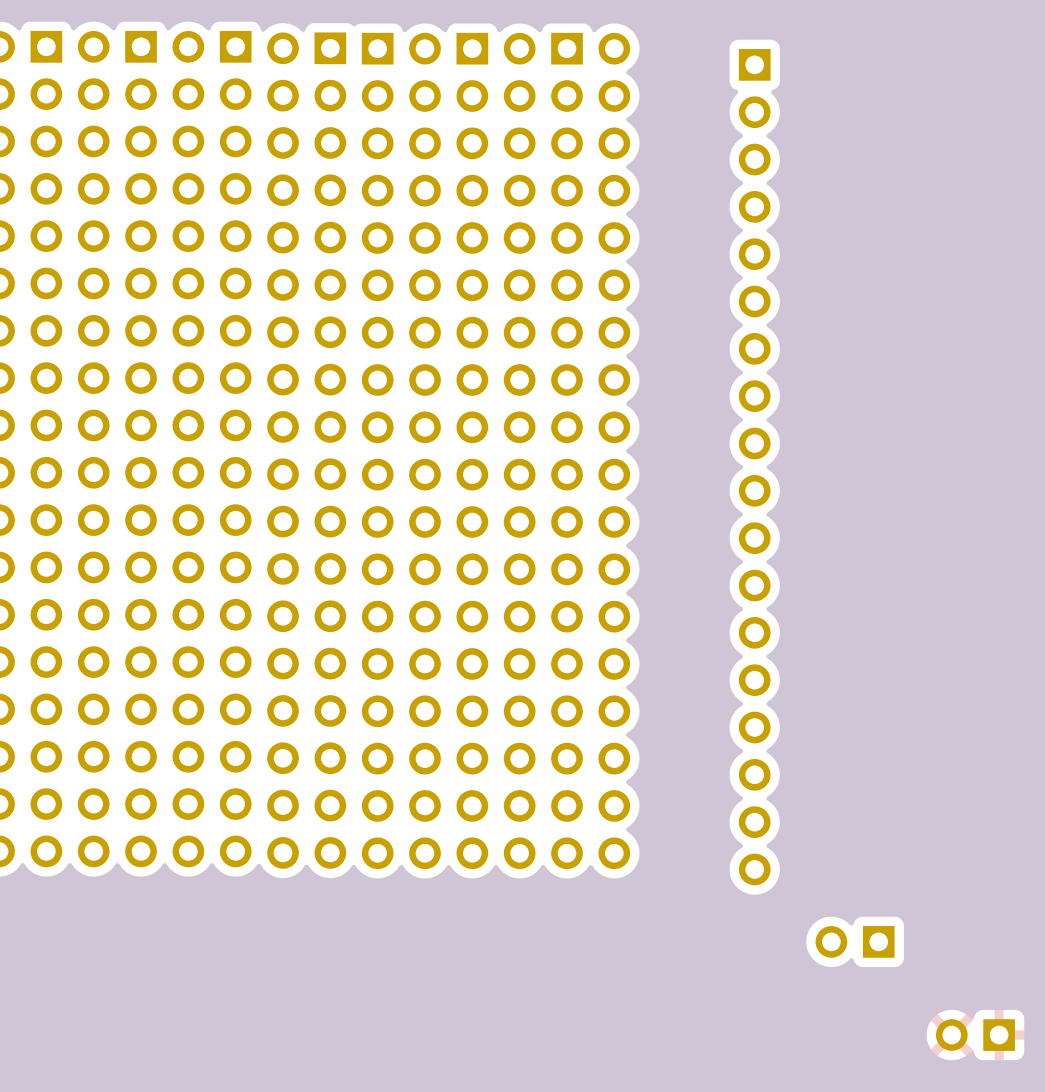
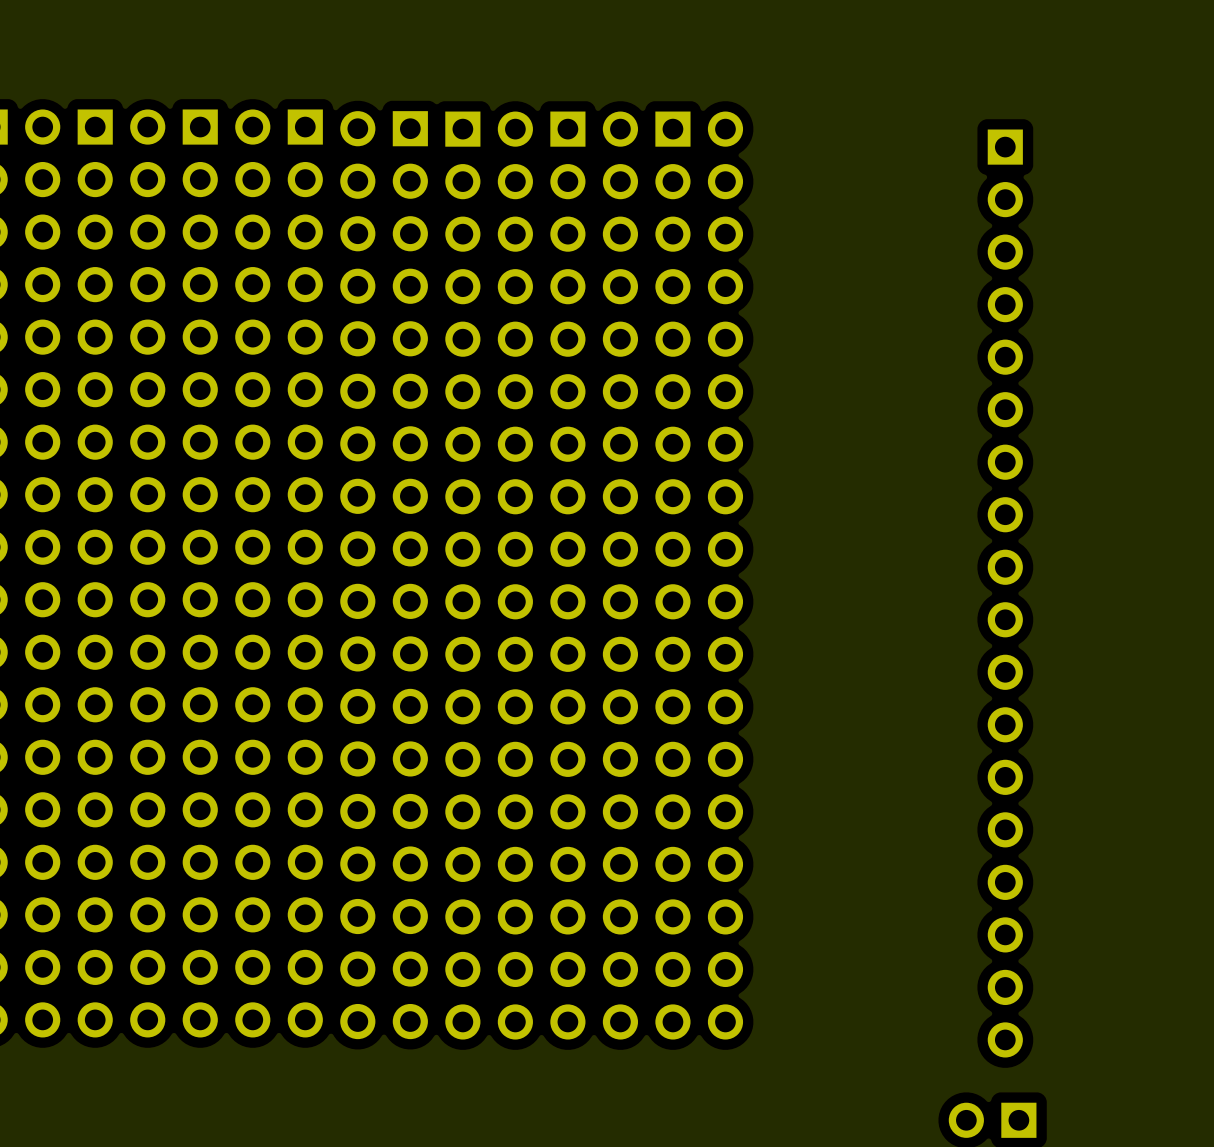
part position: (754, 467) -> (1005, 593)

